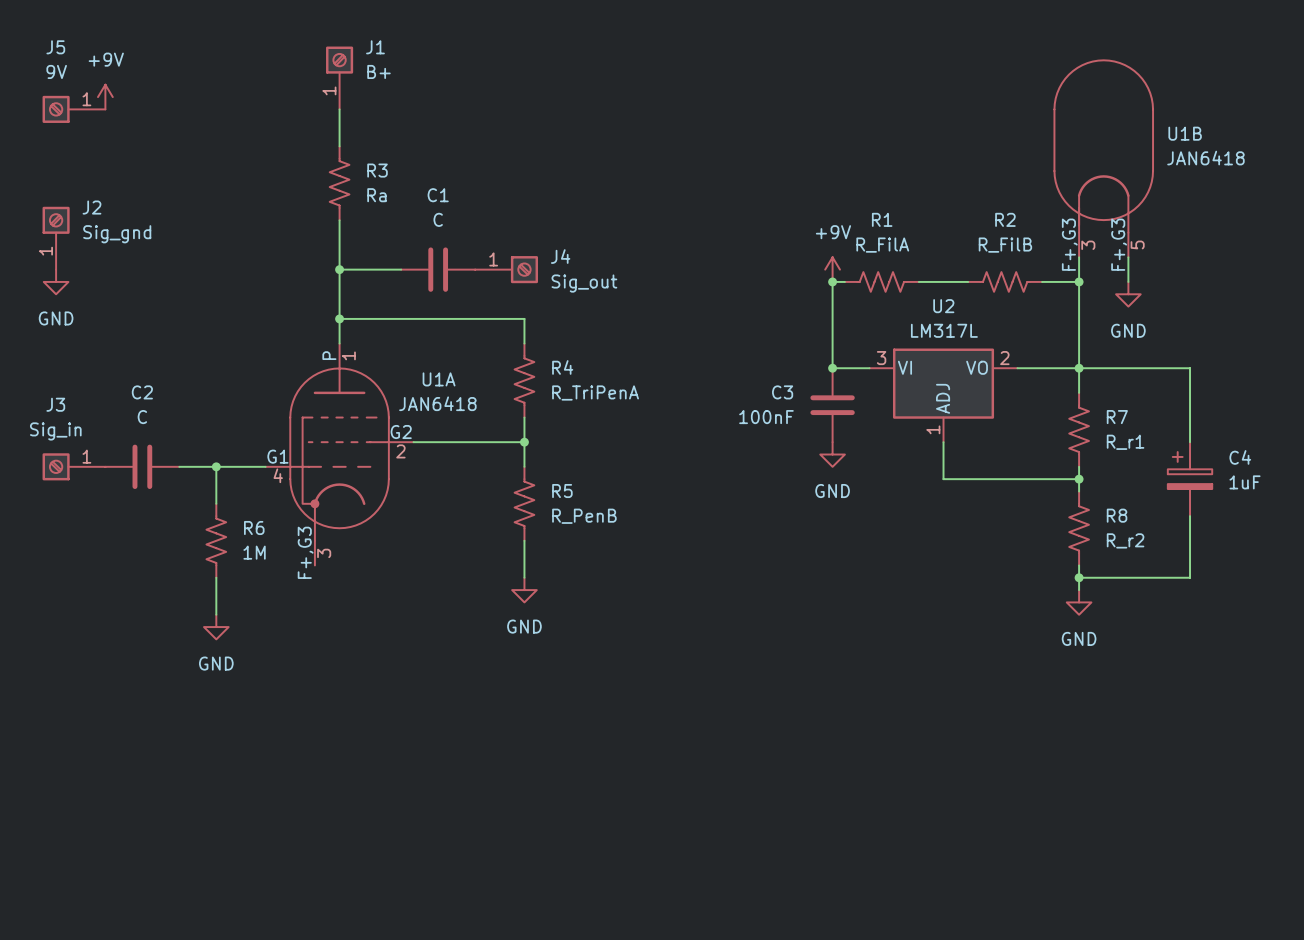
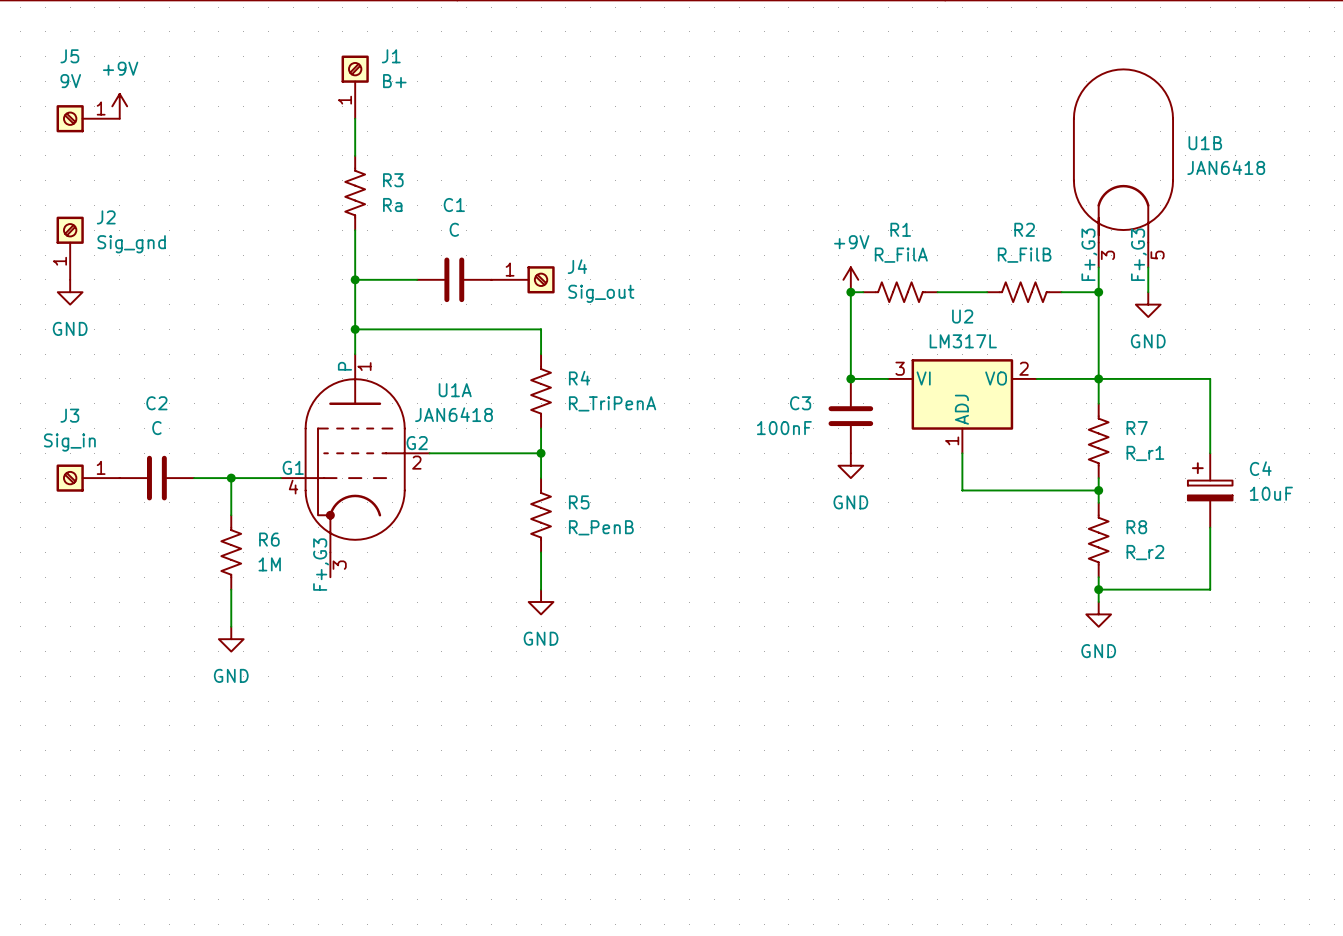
C4 value: 1uF (1244, 482) -> 10uF (1271, 493)

